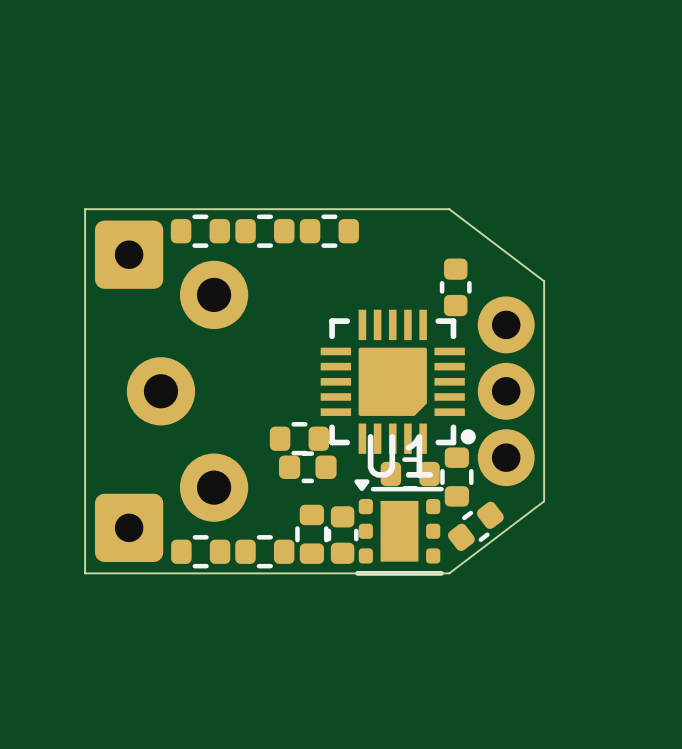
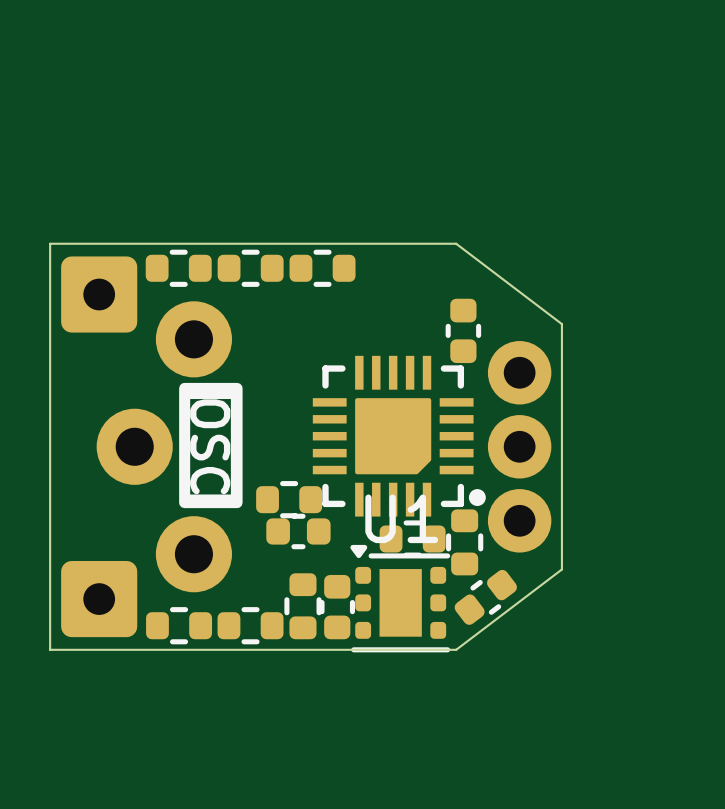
drawing: none -> [179, 382, 243, 509]
text: none -> OSC (210, 446)

